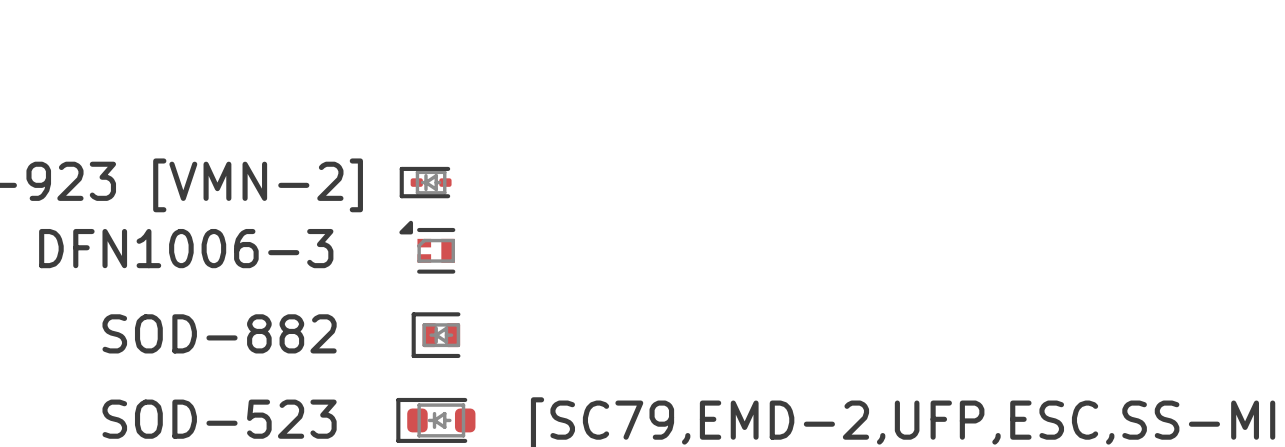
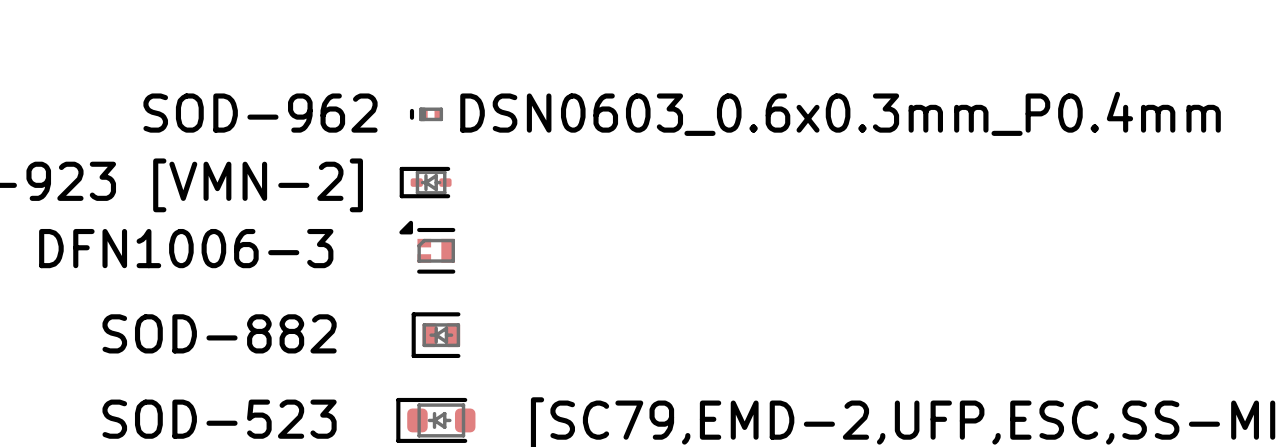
SOD-962: none -> DSN0603_0.6x0.3mm_P0.4mm (426, 114)

